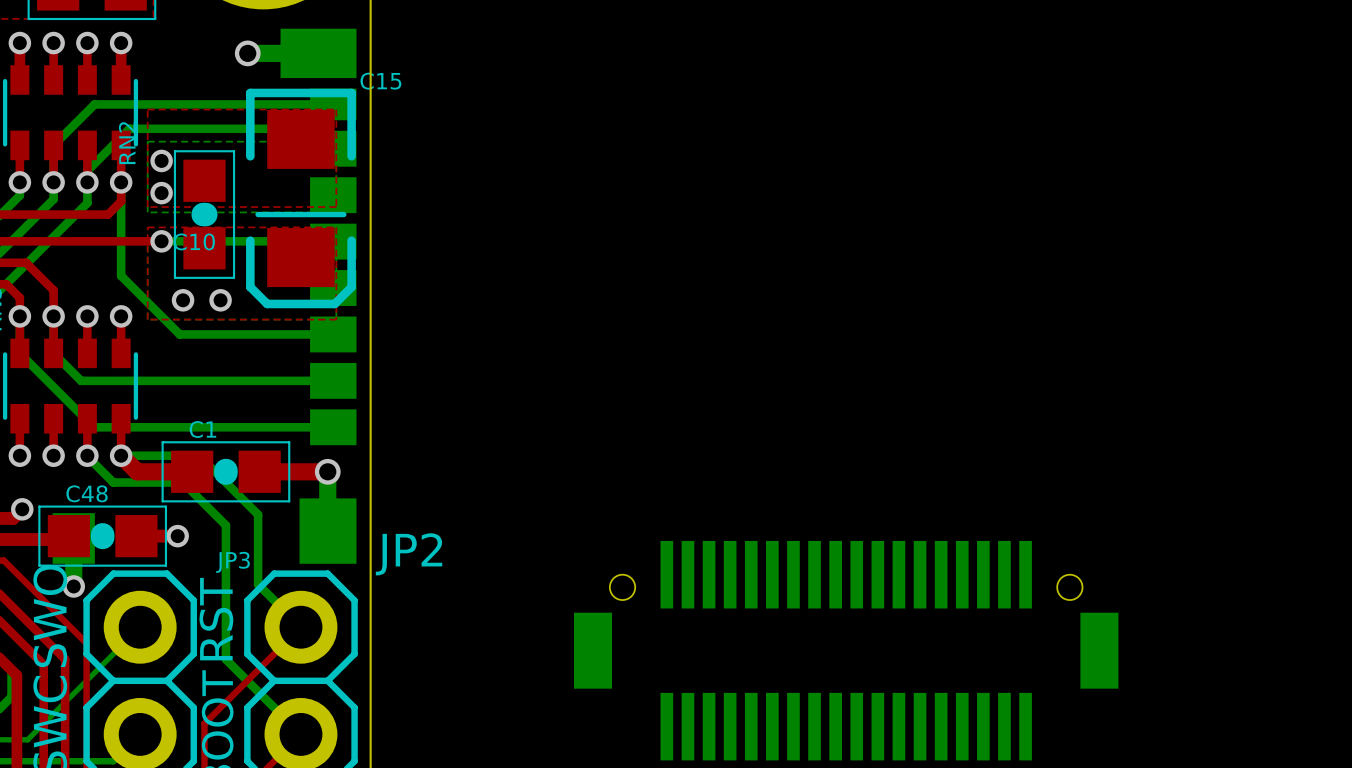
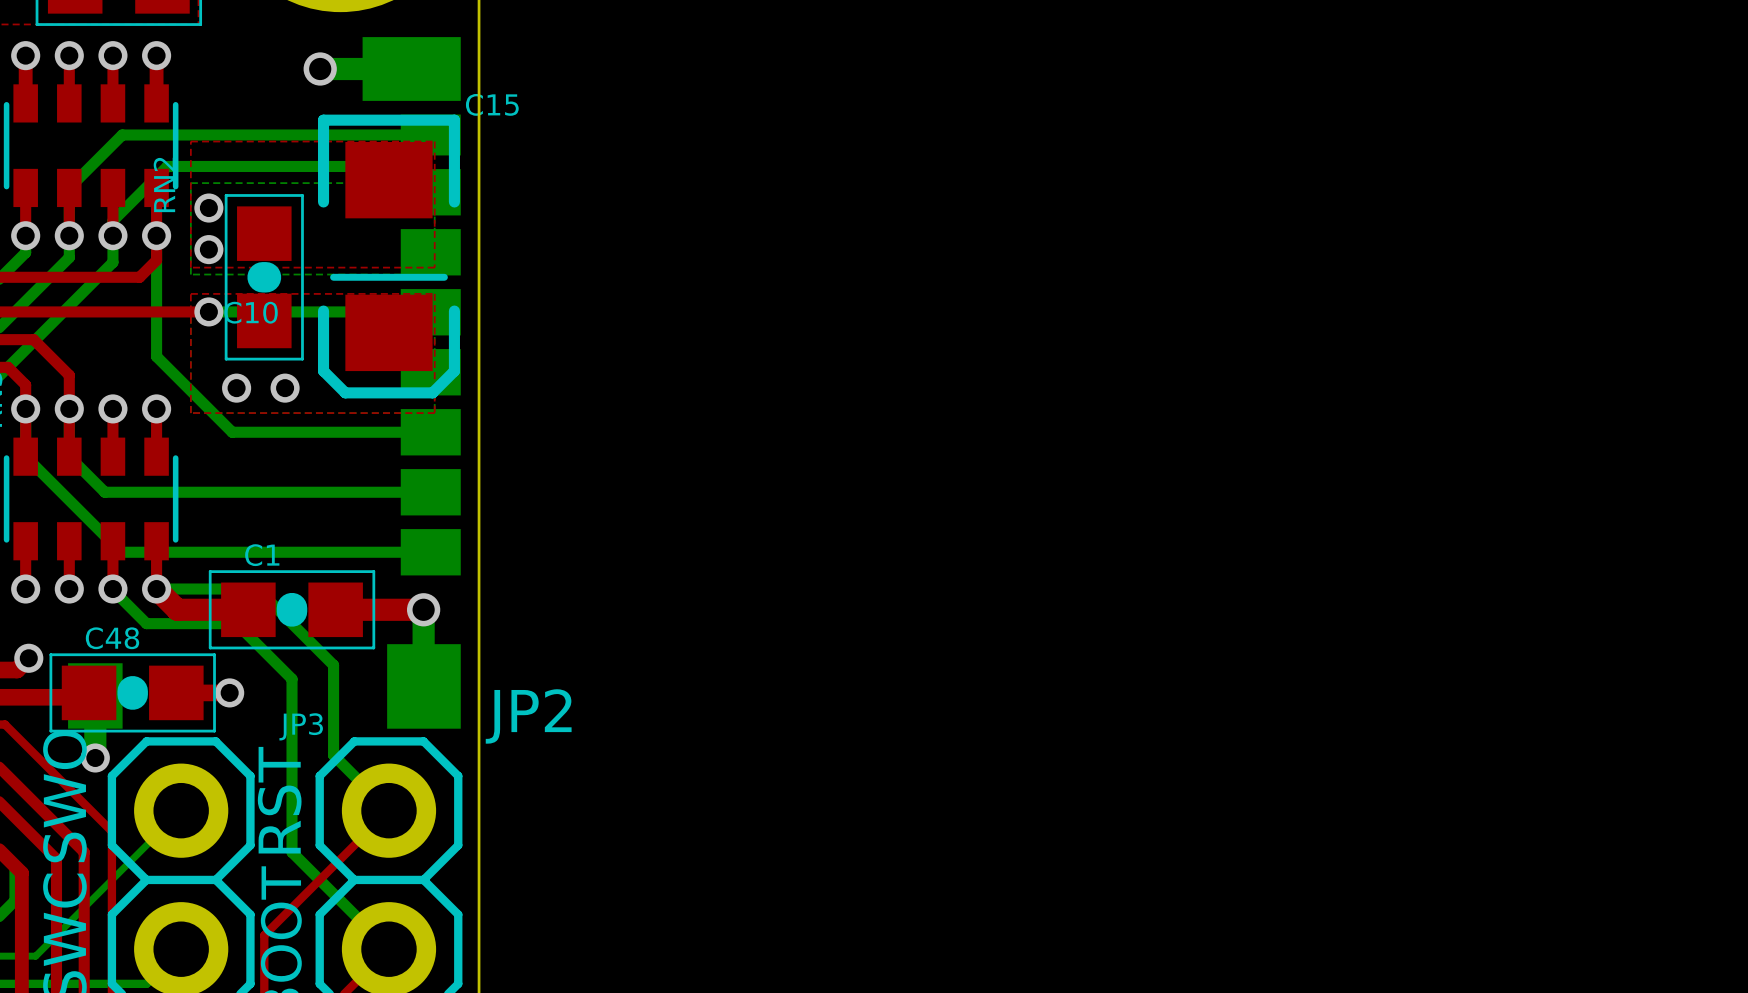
part: (846, 650) -> none

